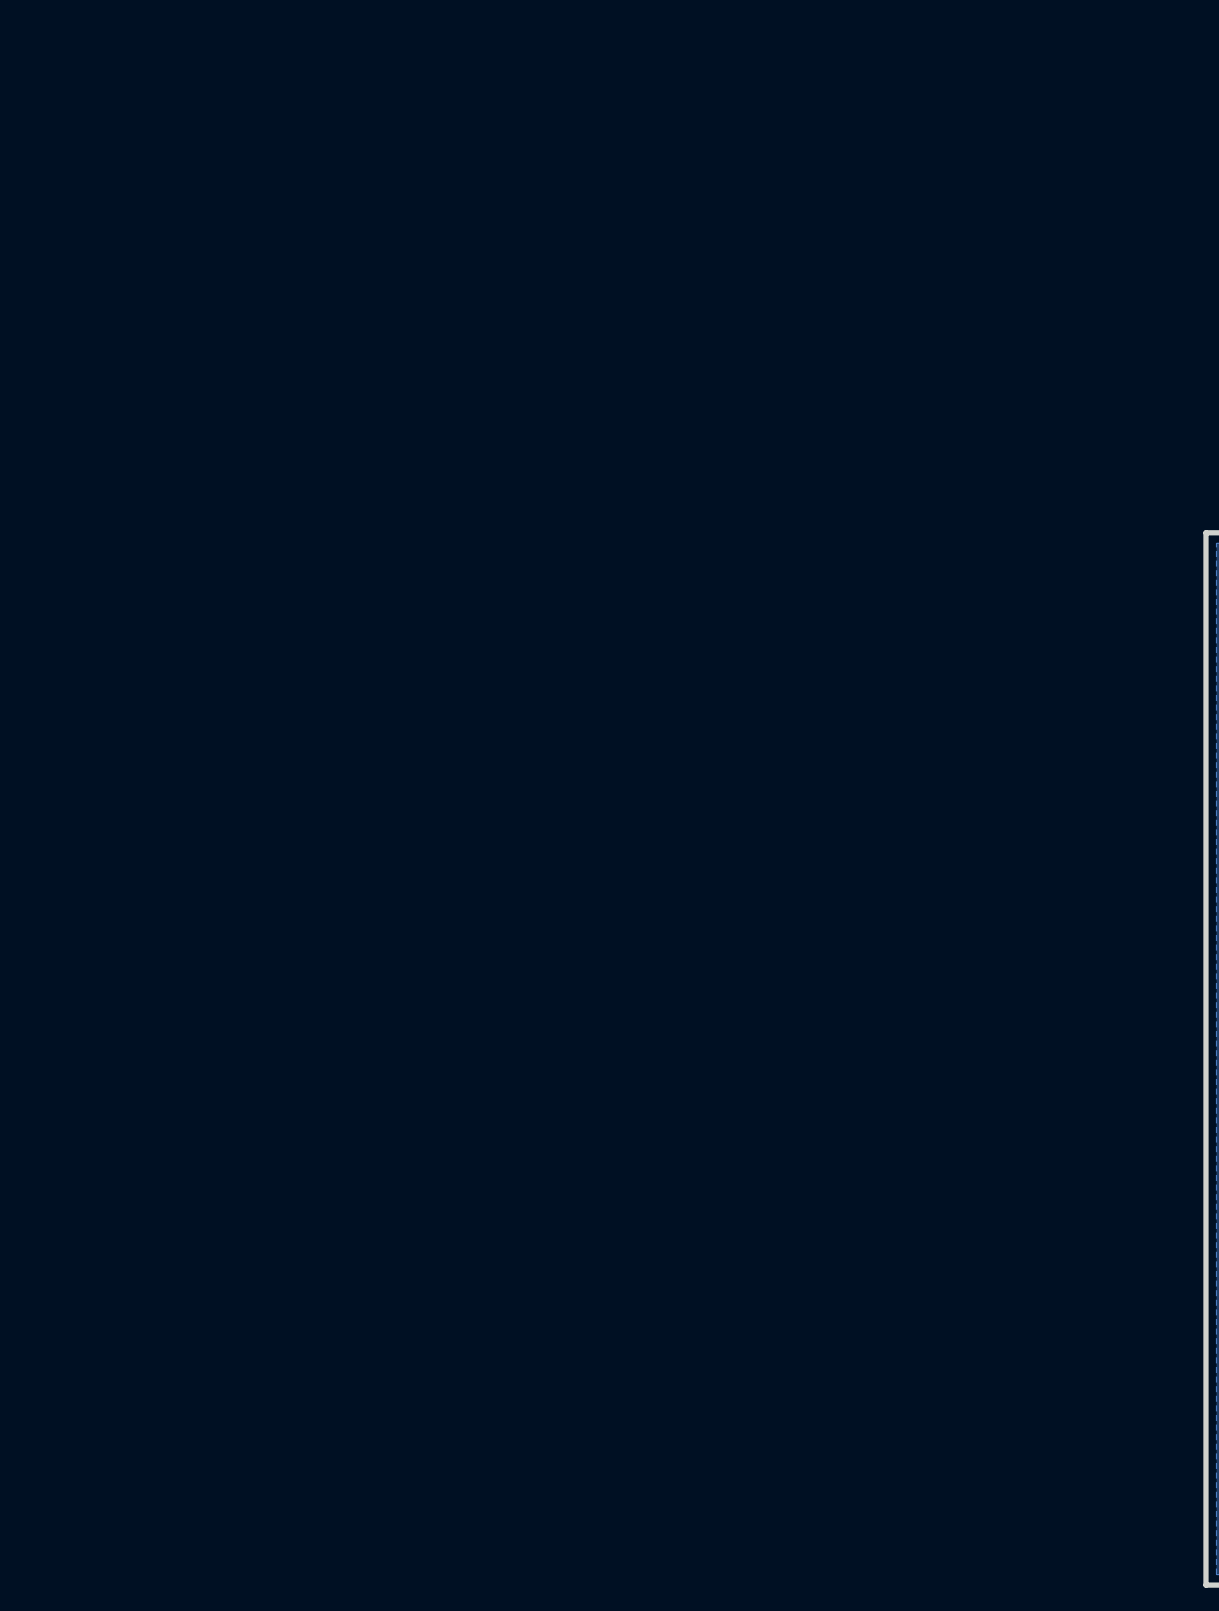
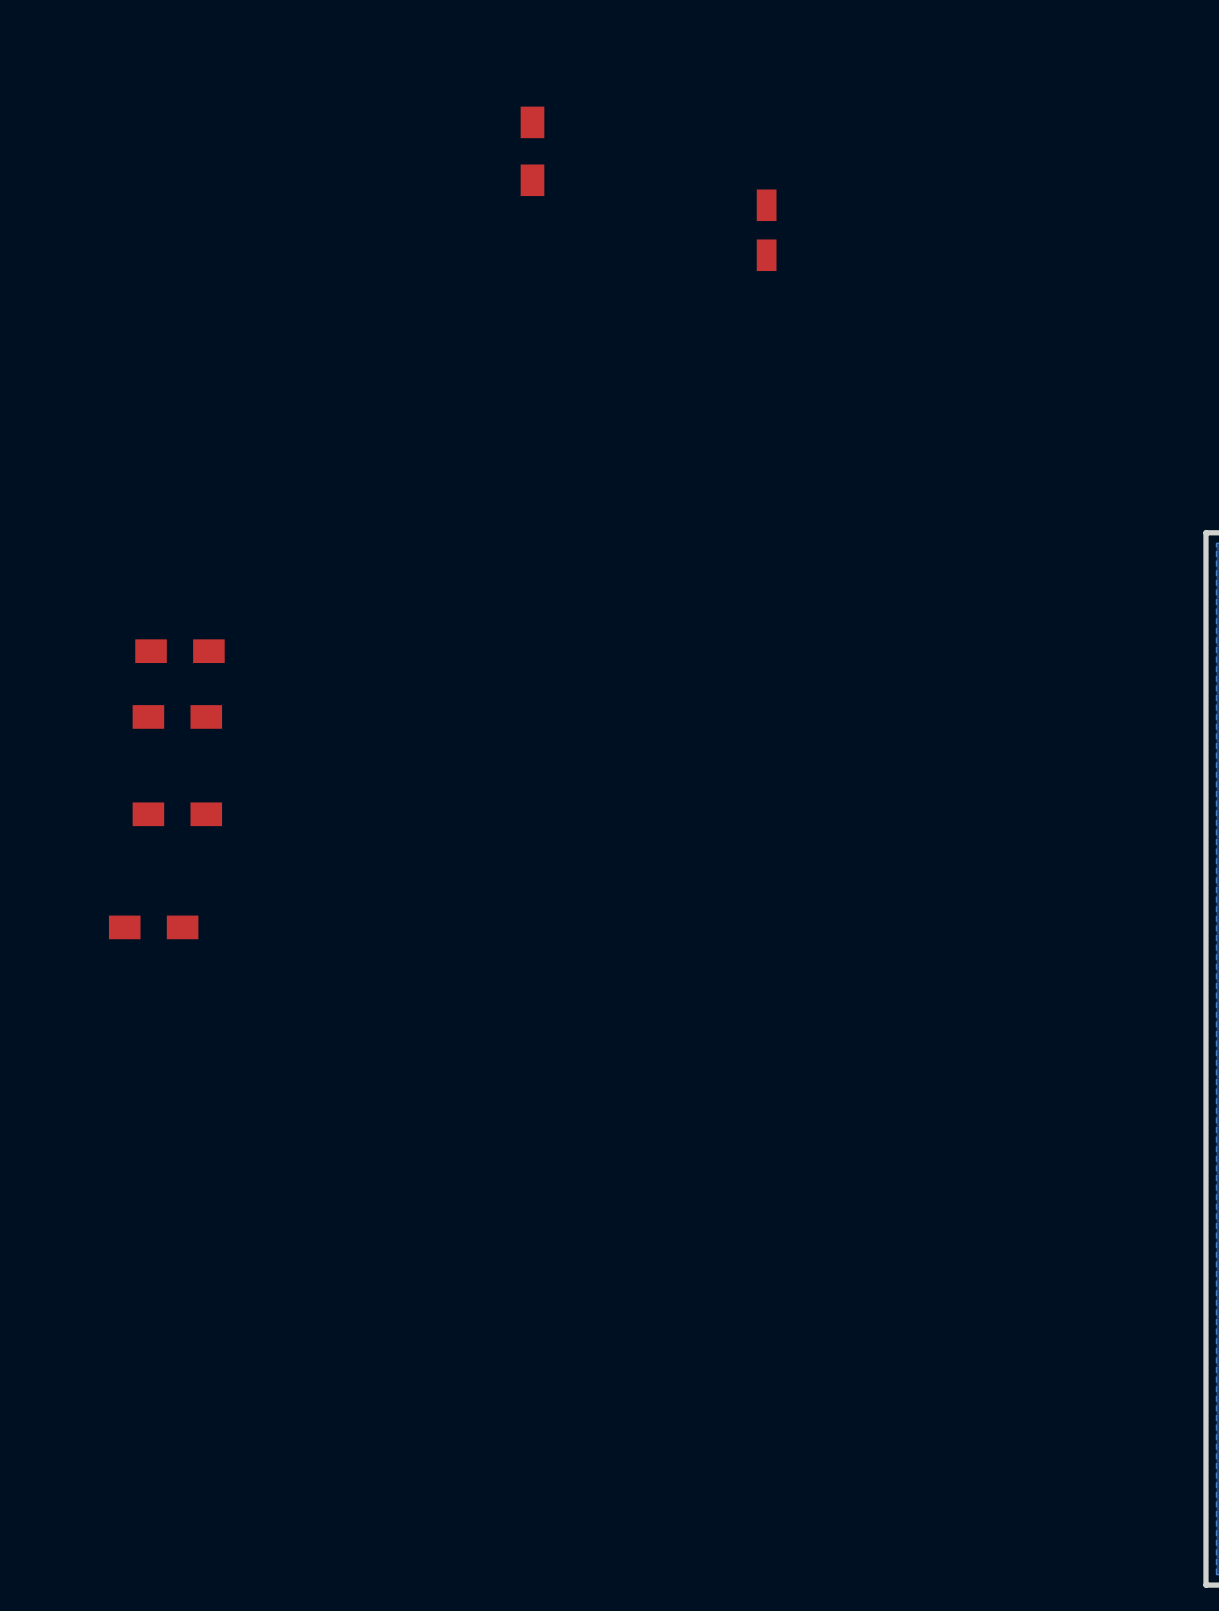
part: none -> (532, 151)
part: none -> (766, 230)
part: none -> (179, 651)
part: none -> (177, 716)
part: none -> (177, 814)
part: none -> (153, 927)

